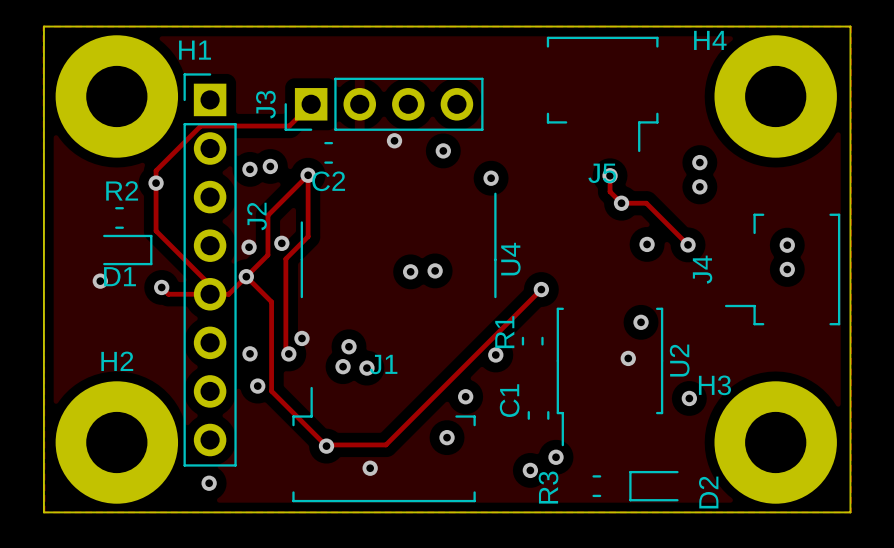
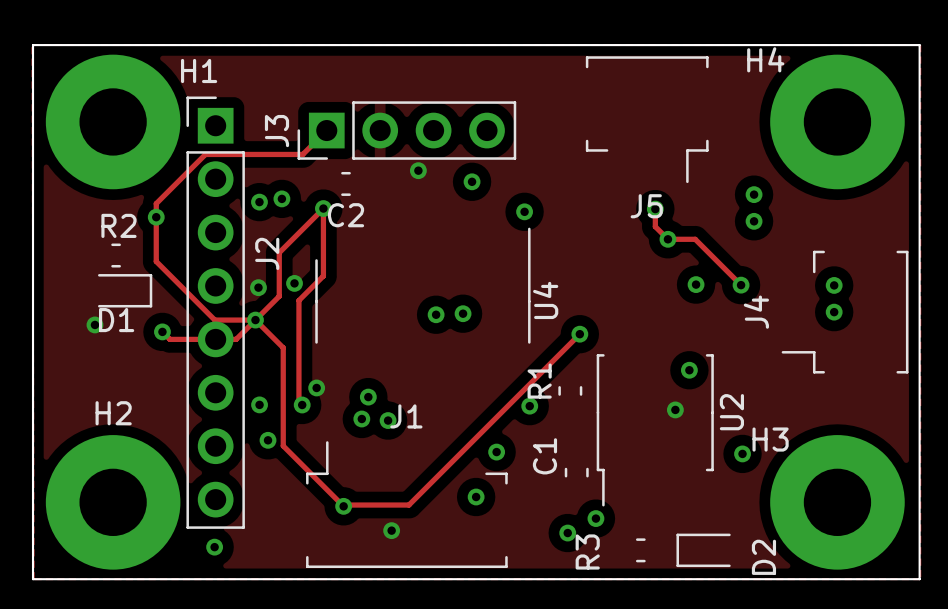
track: (156, 223) (156, 230) (210, 285) (210, 294) -> (156, 261) (214, 320) (255, 320)
via position: (787, 245) -> (834, 285)
via position: (787, 269) -> (834, 312)

